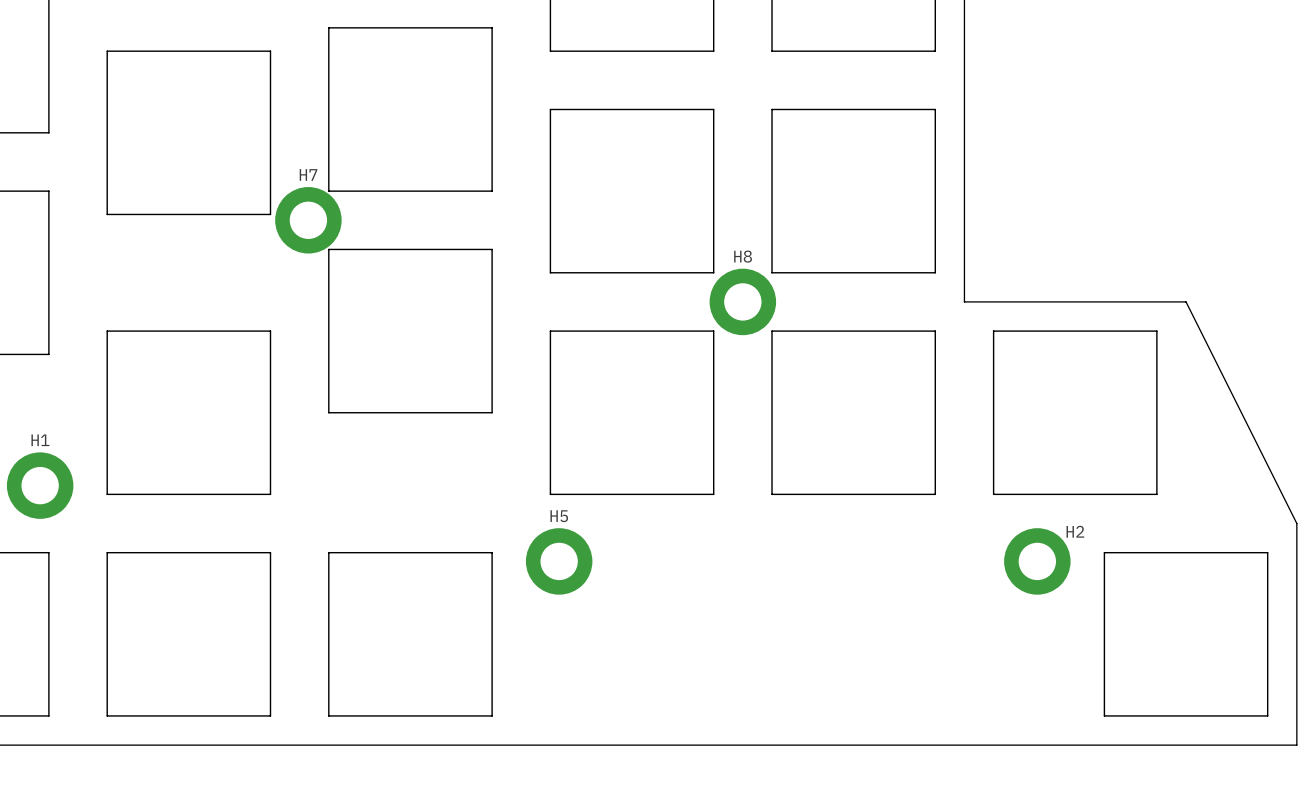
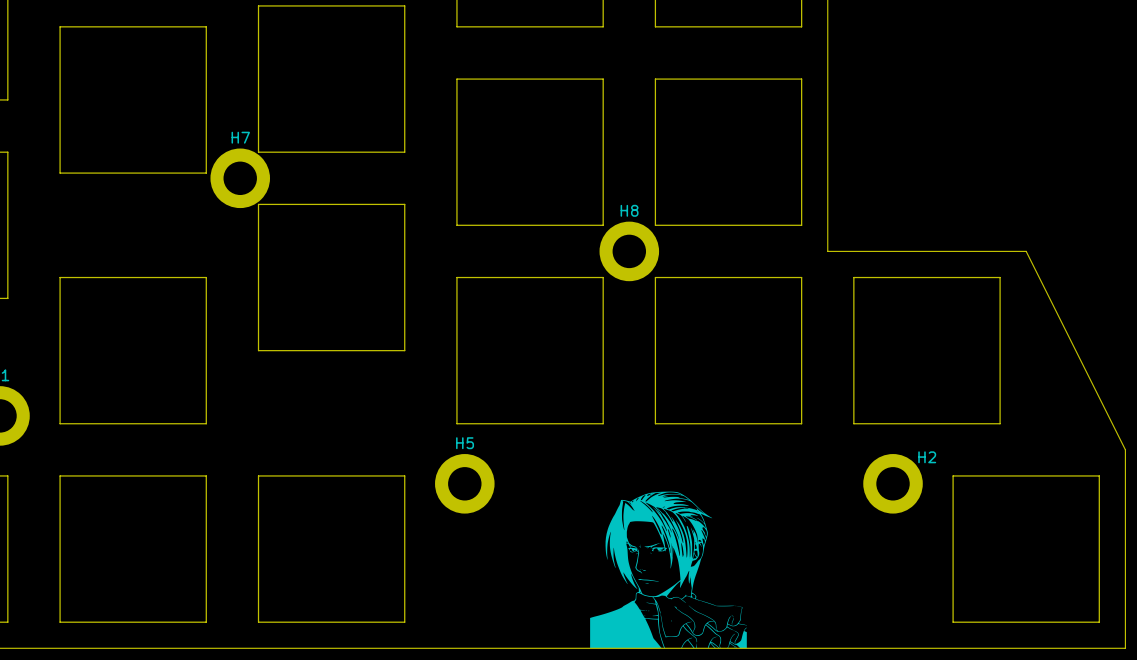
drawing: none -> [590, 491, 747, 649]

